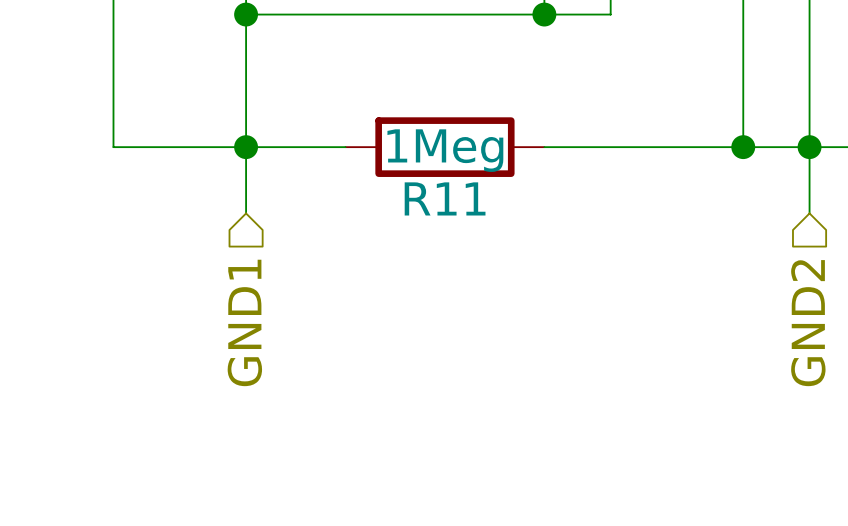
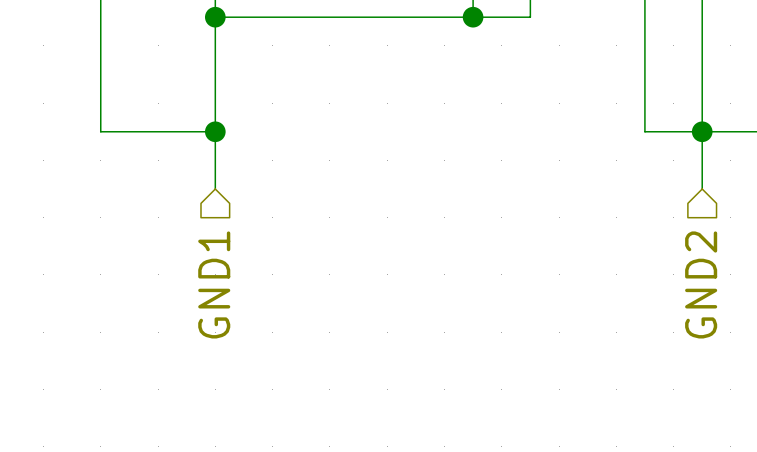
wire: (246, 147) (345, 147) -> none
R11: 1Meg (444, 147) -> none
wire: (544, 147) (743, 147) -> none
junction: (743, 147) -> none

